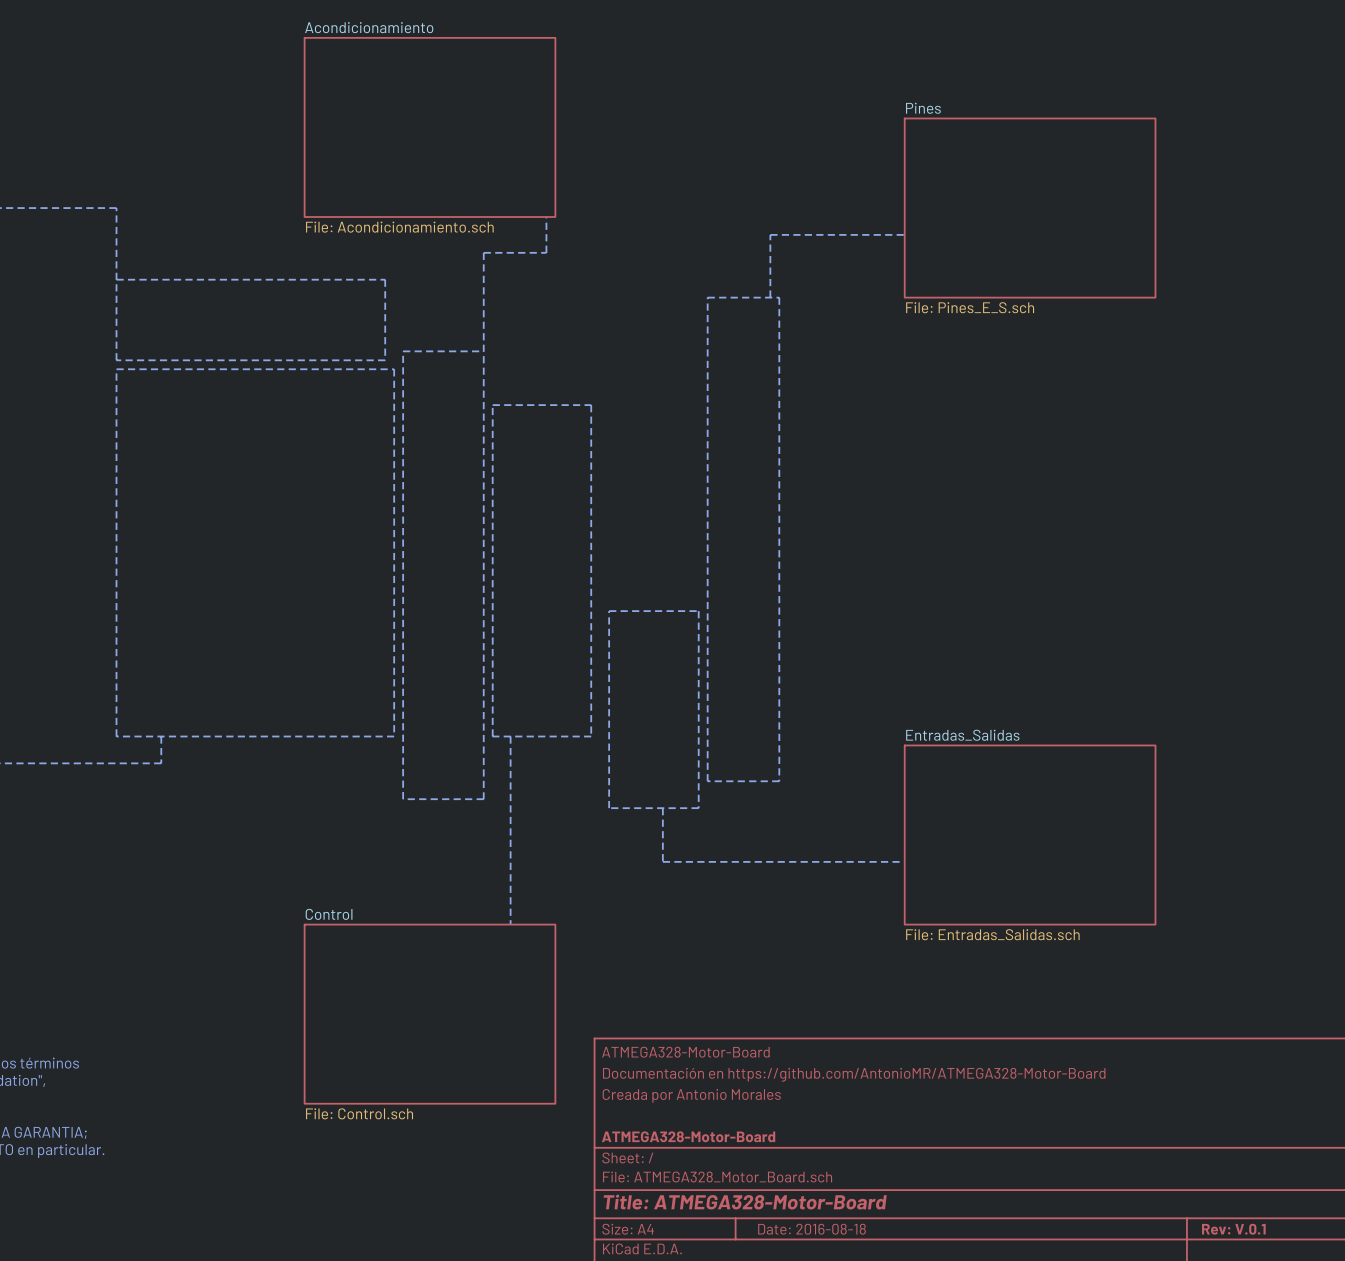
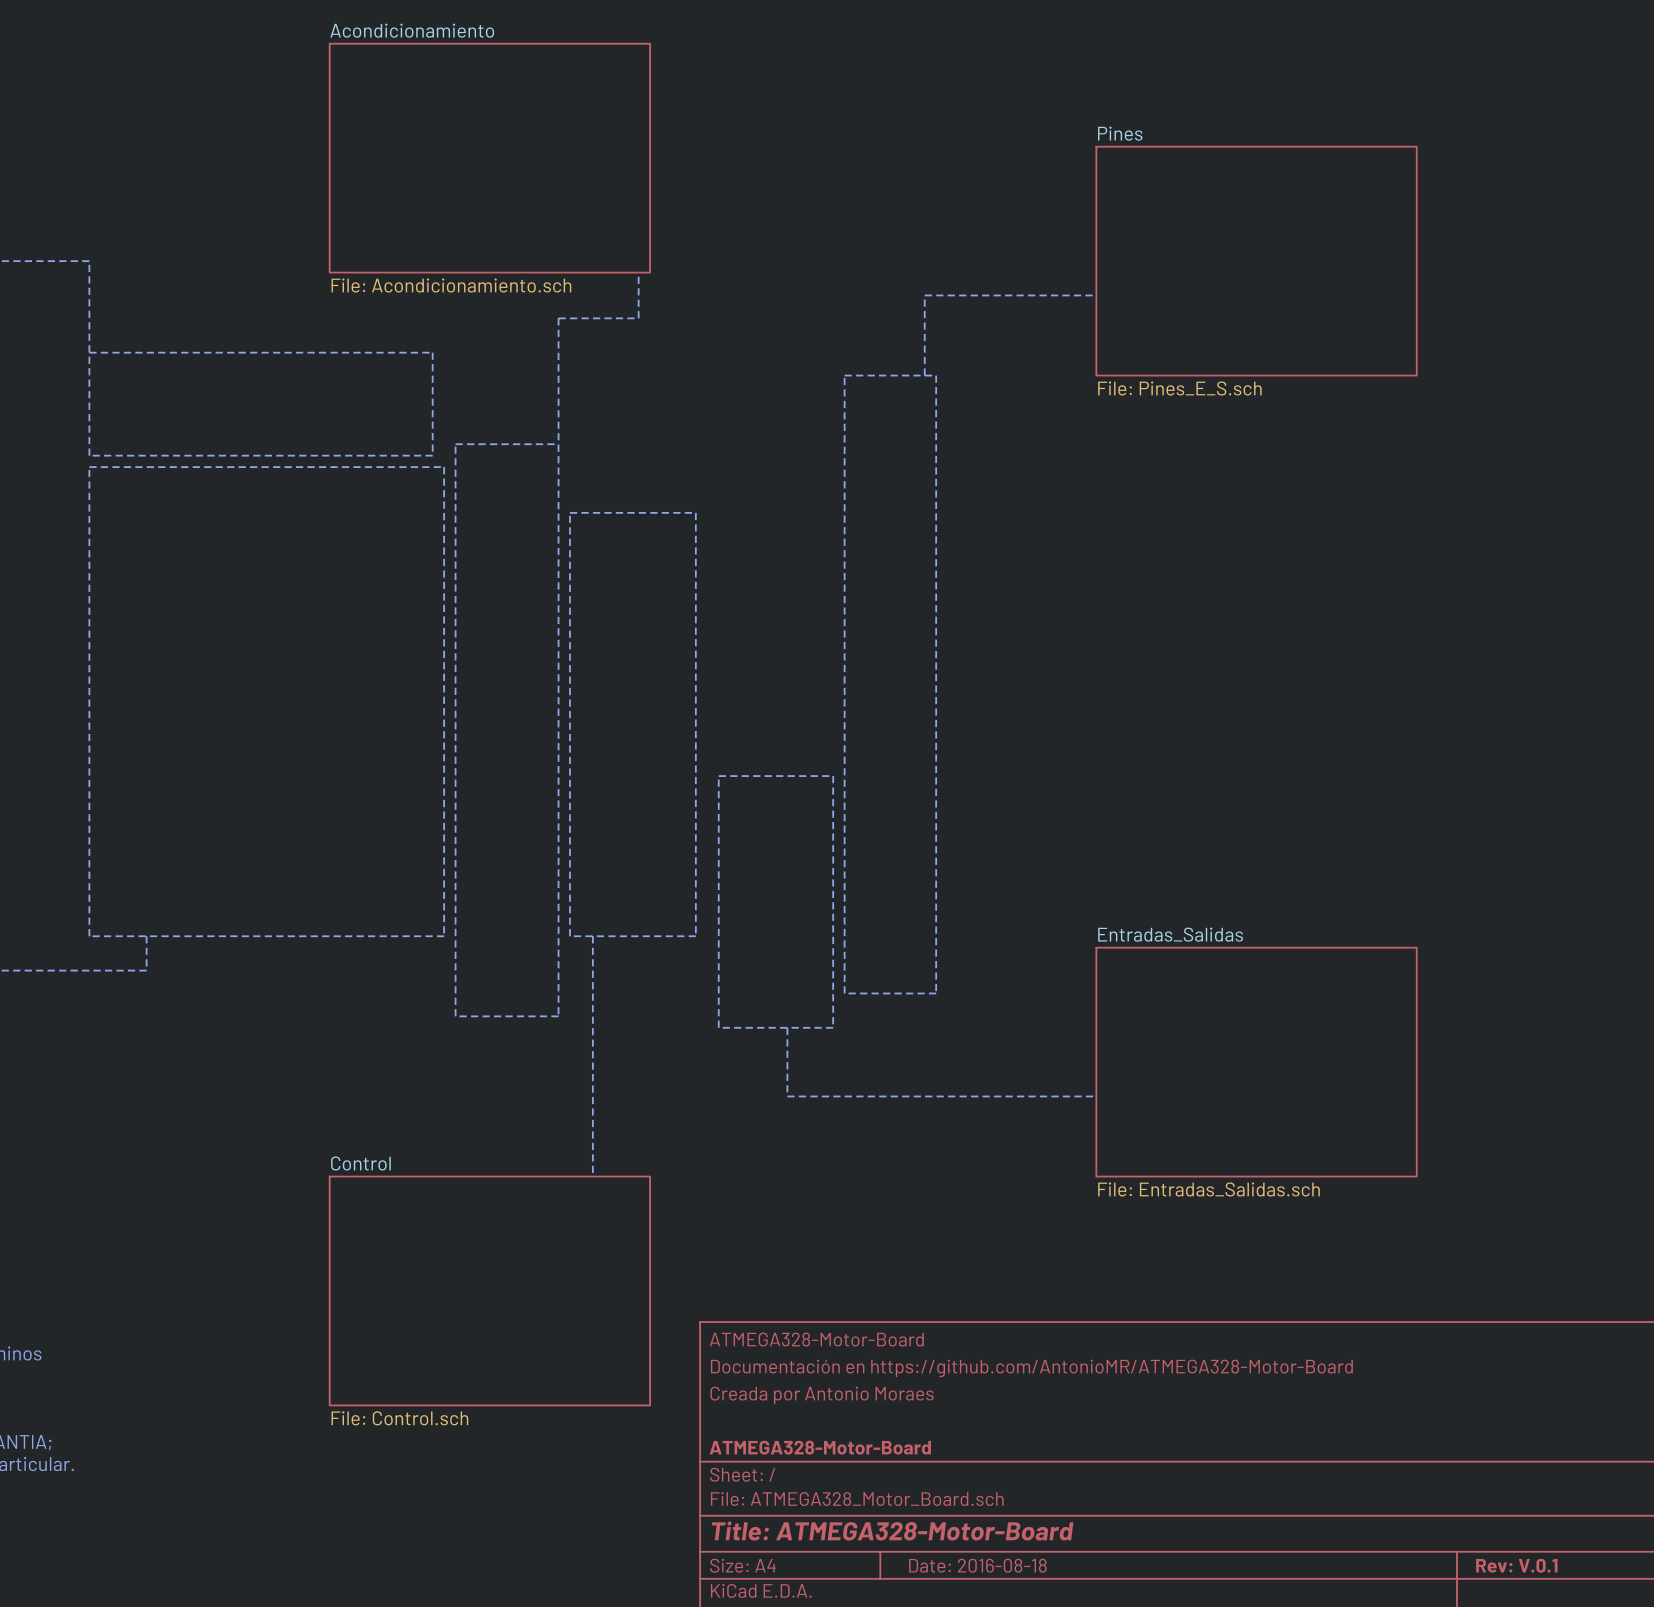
title block: Creada por Antonio Morales (691, 1095) -> Creada por Antonio Moraes (822, 1395)

